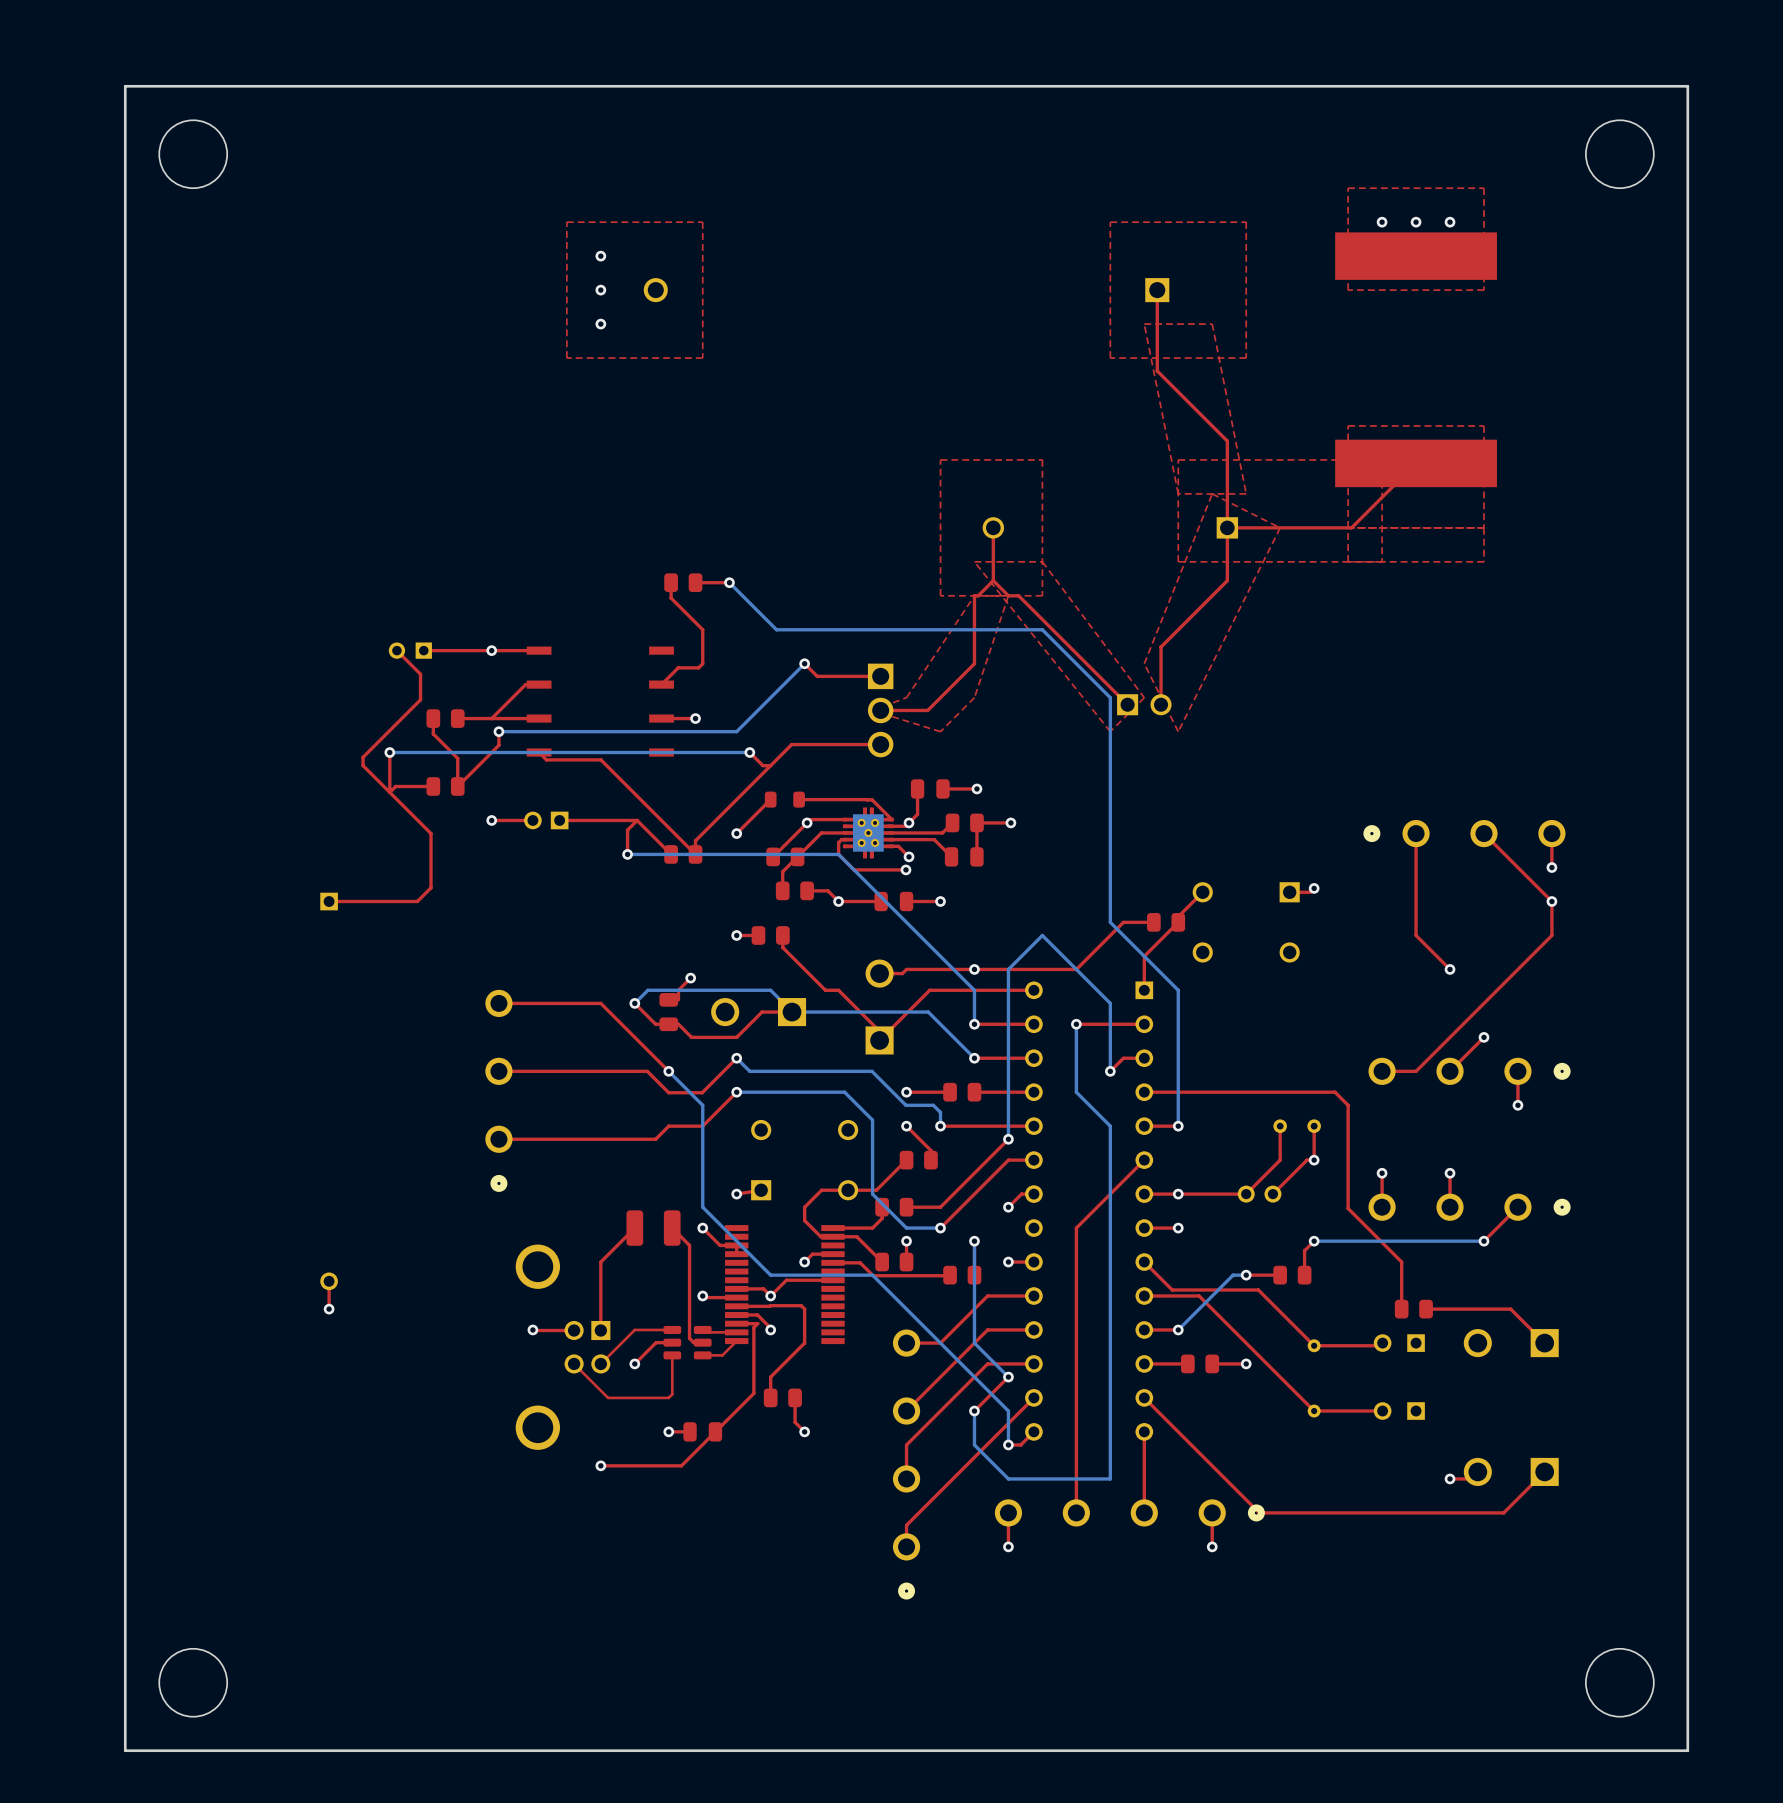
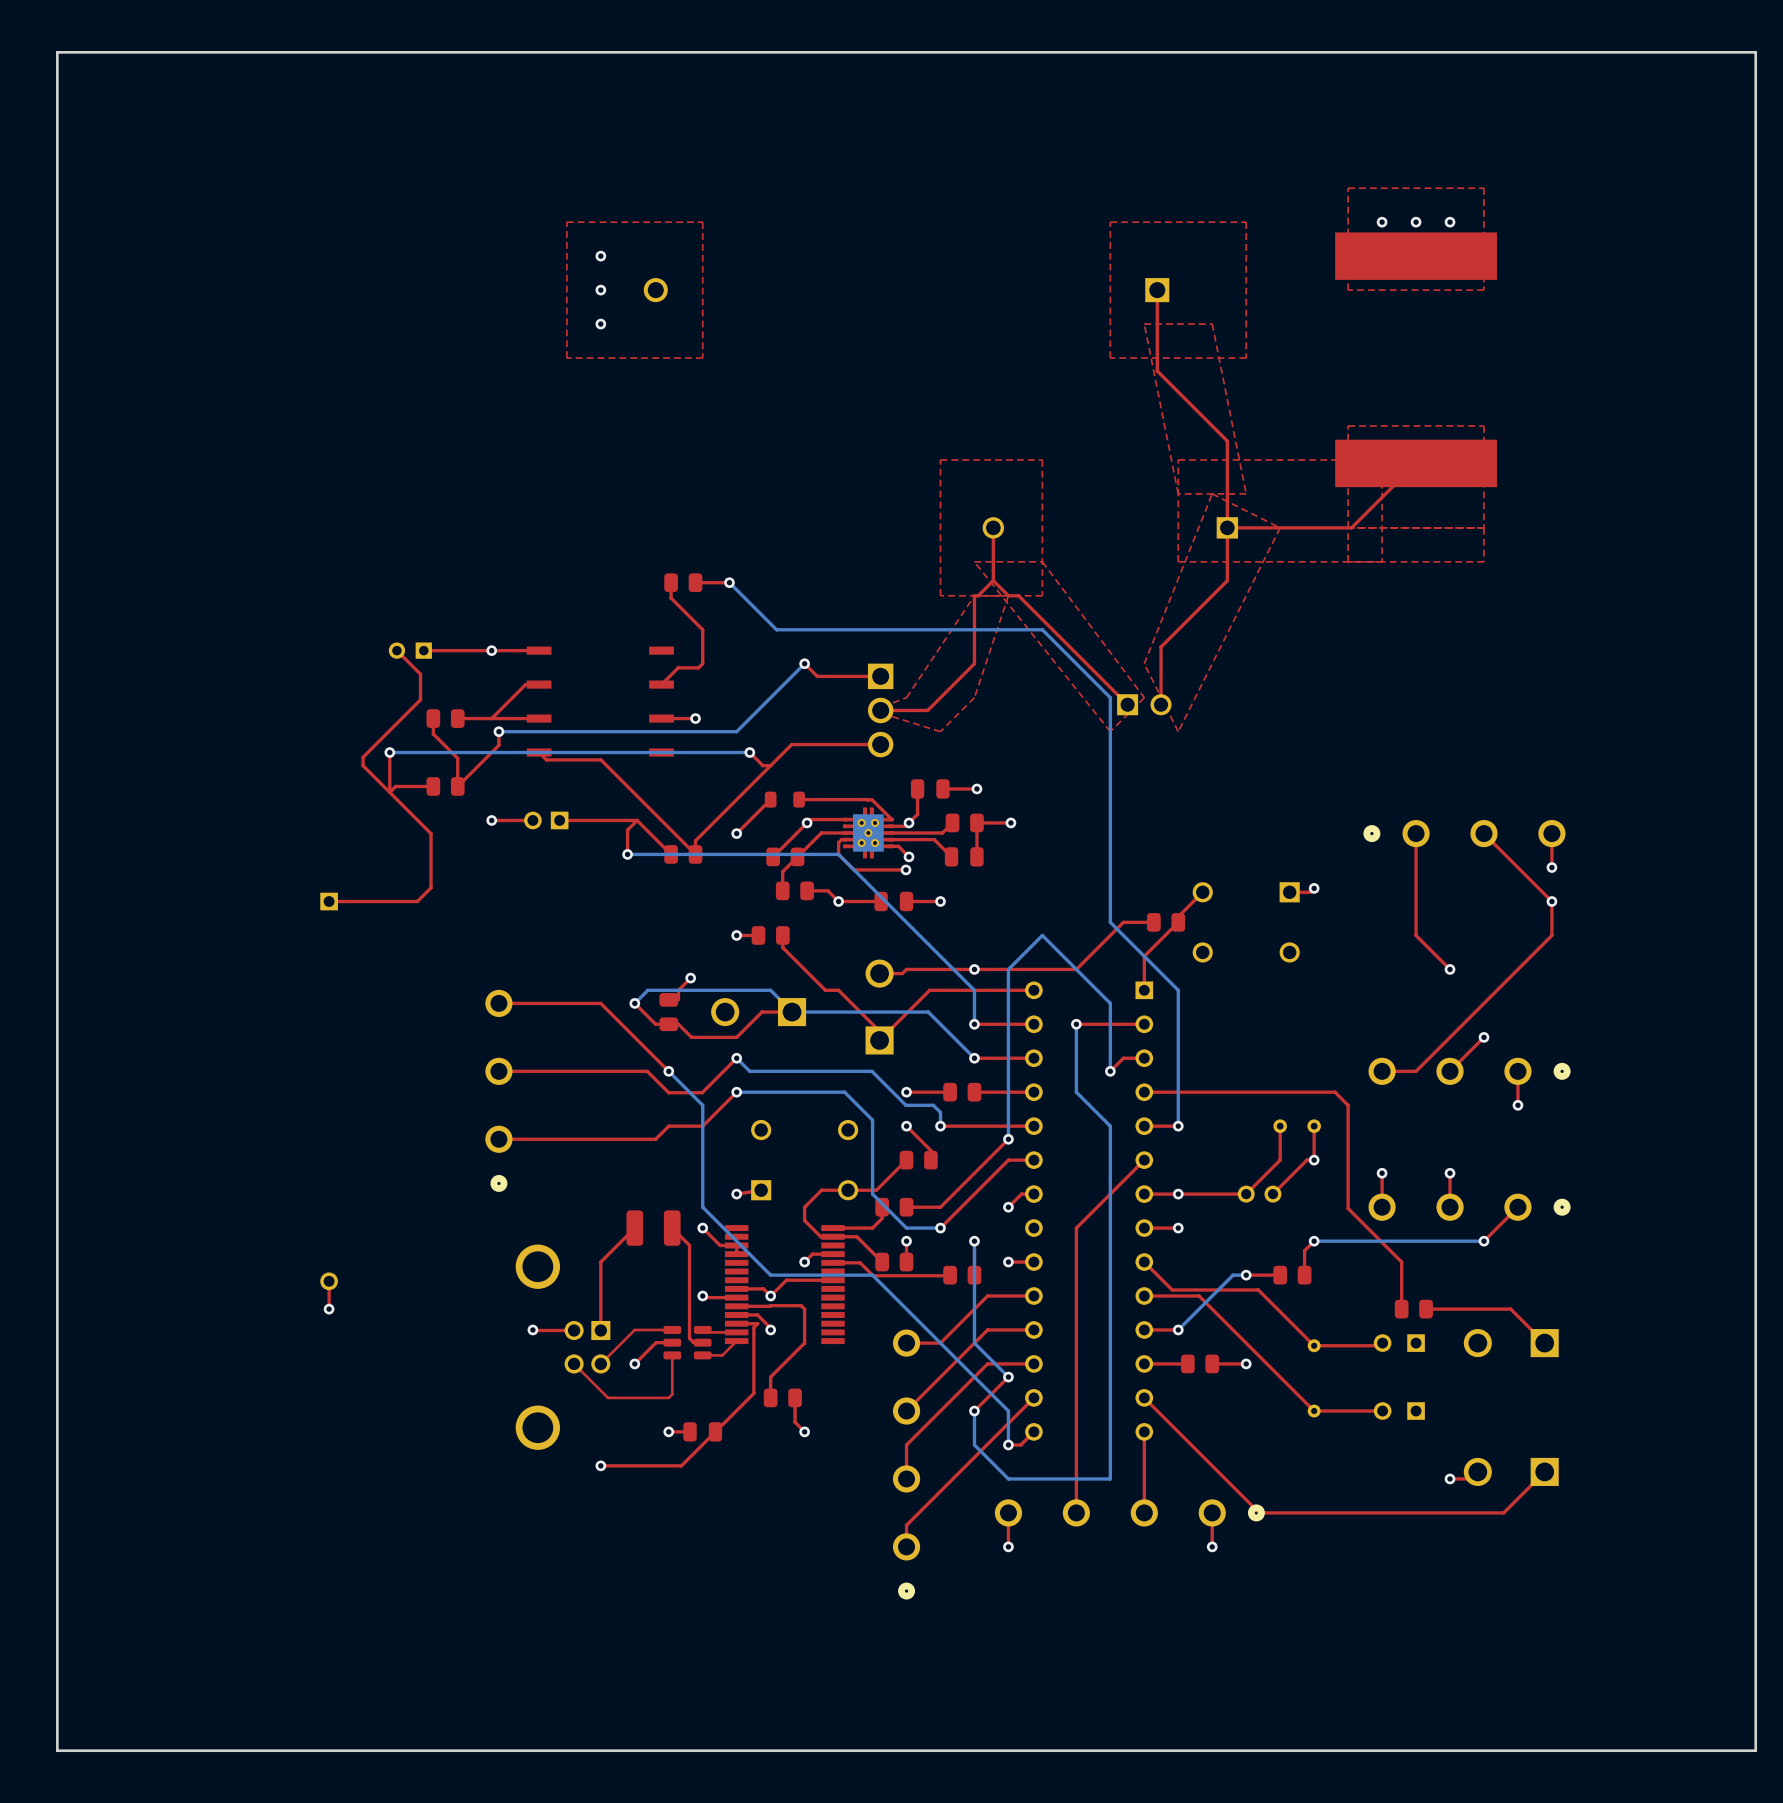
round board edge: [158, 119, 228, 189] -> none
round board edge: [1585, 119, 1655, 189] -> none
round board edge: [158, 1648, 228, 1718] -> none
round board edge: [1585, 1648, 1655, 1718] -> none
board edge: (1687, 1750) (1687, 86) (125, 86) (125, 1750) -> (1687, 1750) (1755, 1750) (1755, 52) (57, 52) (57, 1750) (125, 1750)

